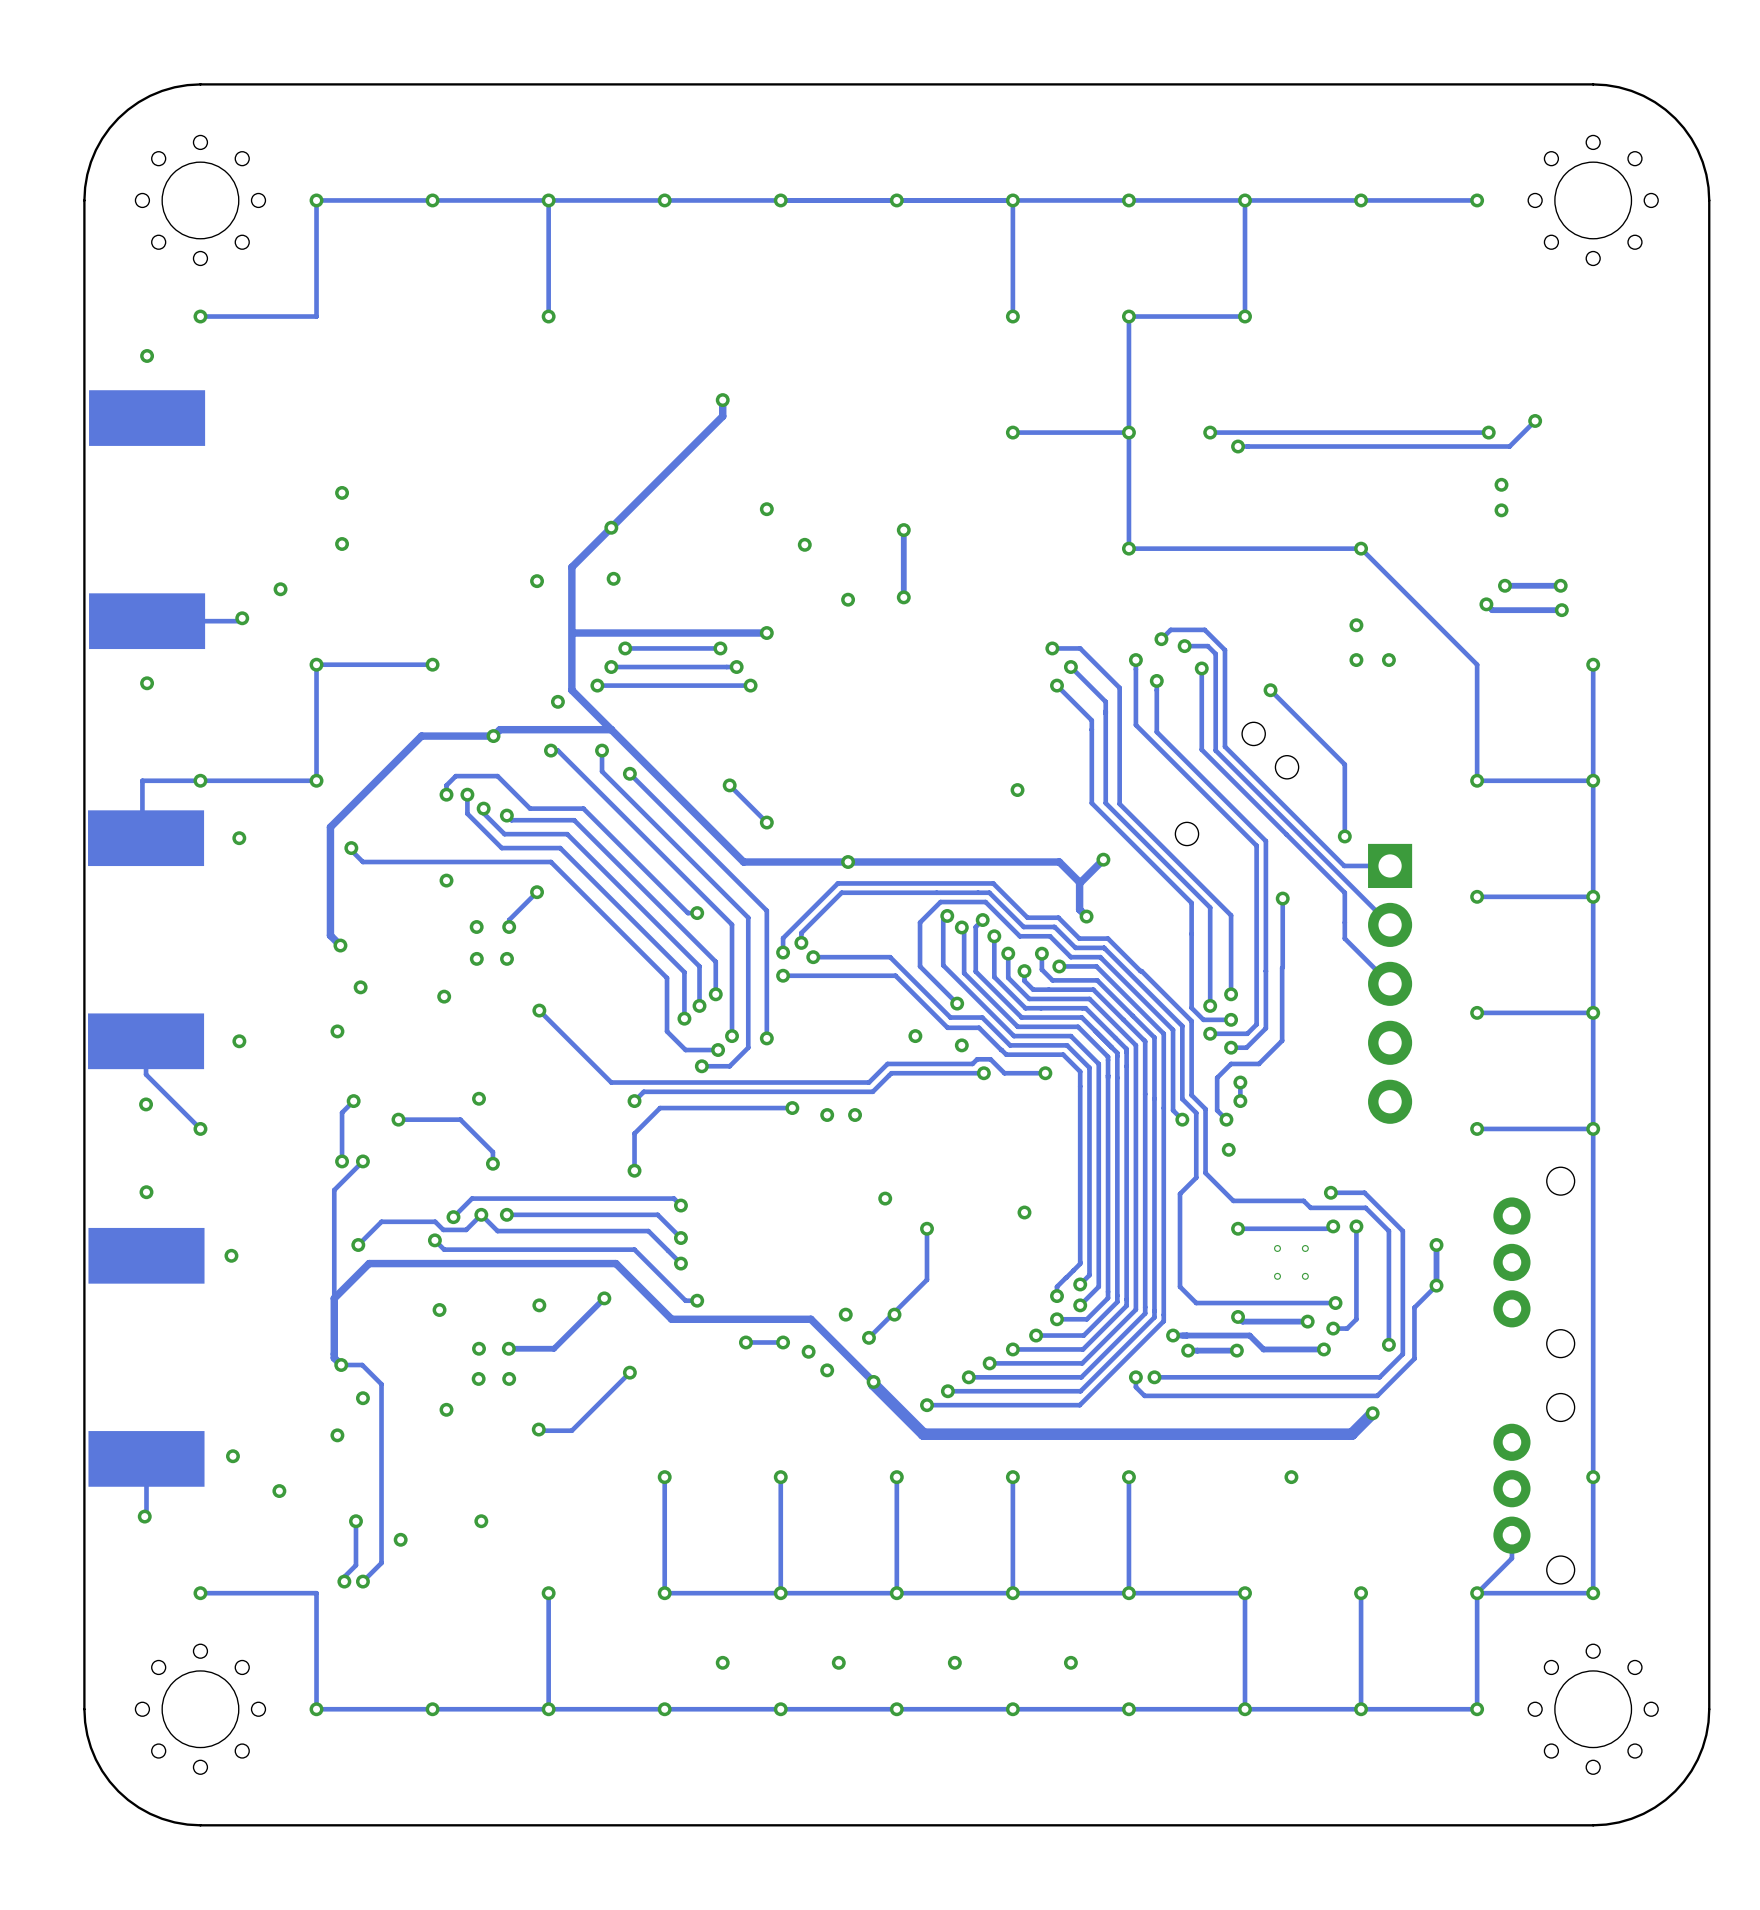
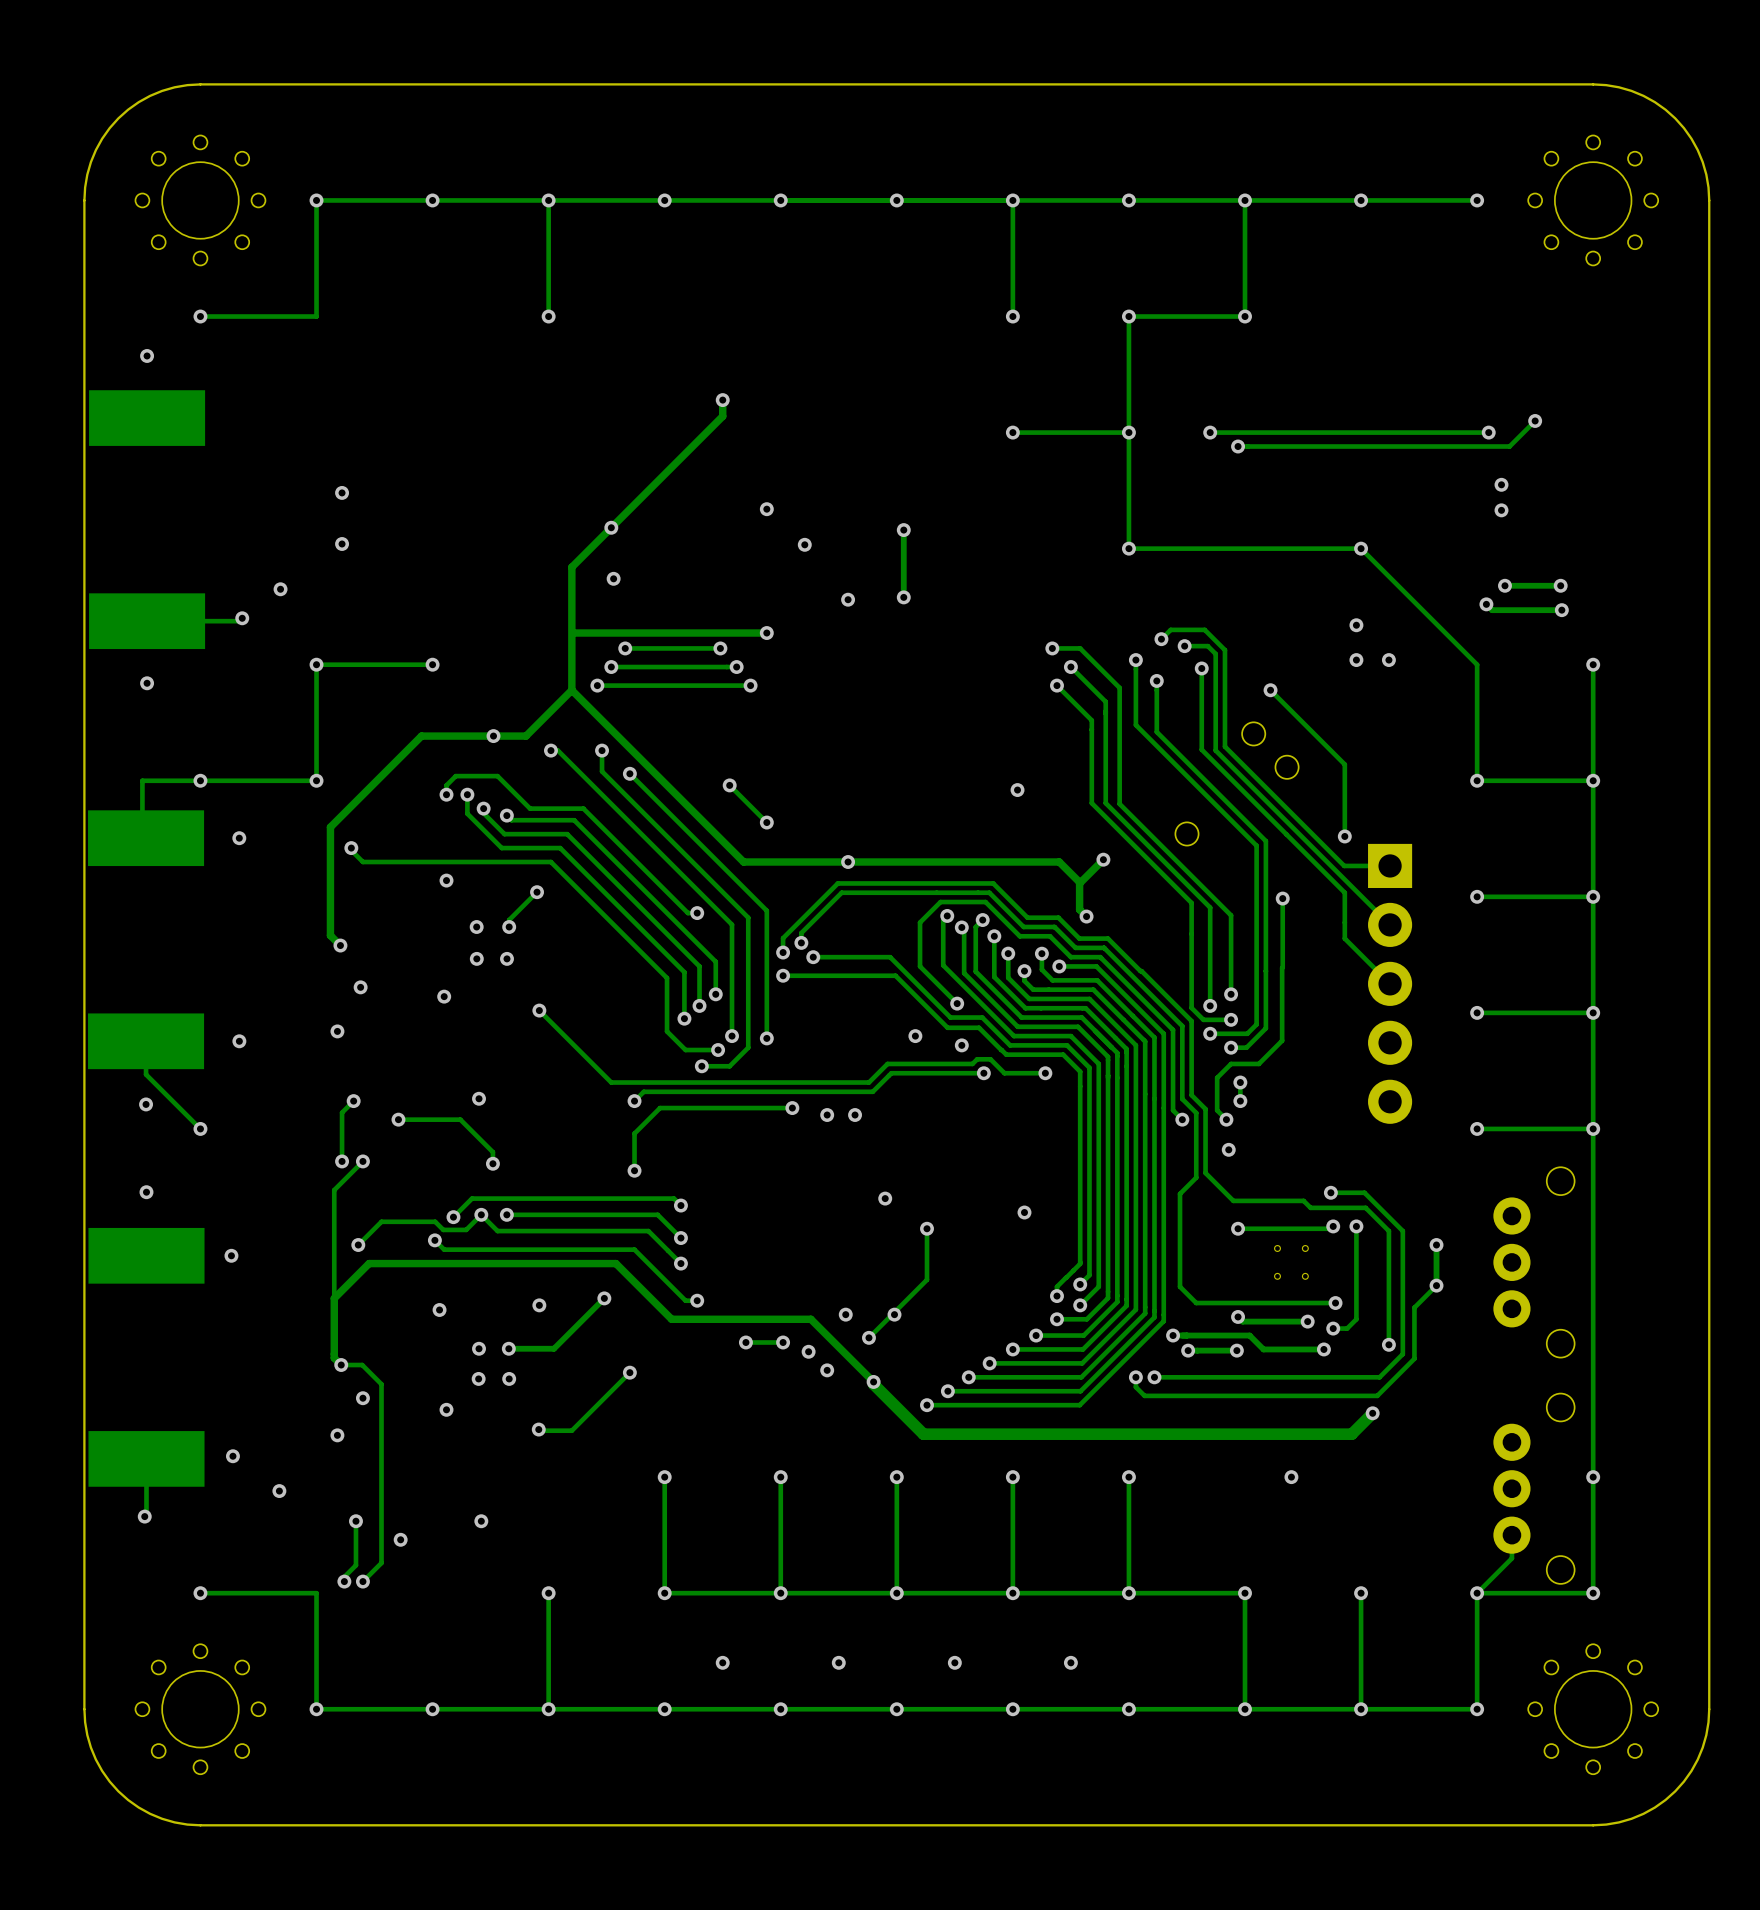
via: (537, 581) -> none
via: (557, 701) -> none
track: (611, 729) (499, 729) (493, 736) -> (571, 690) (526, 736) (493, 736)

